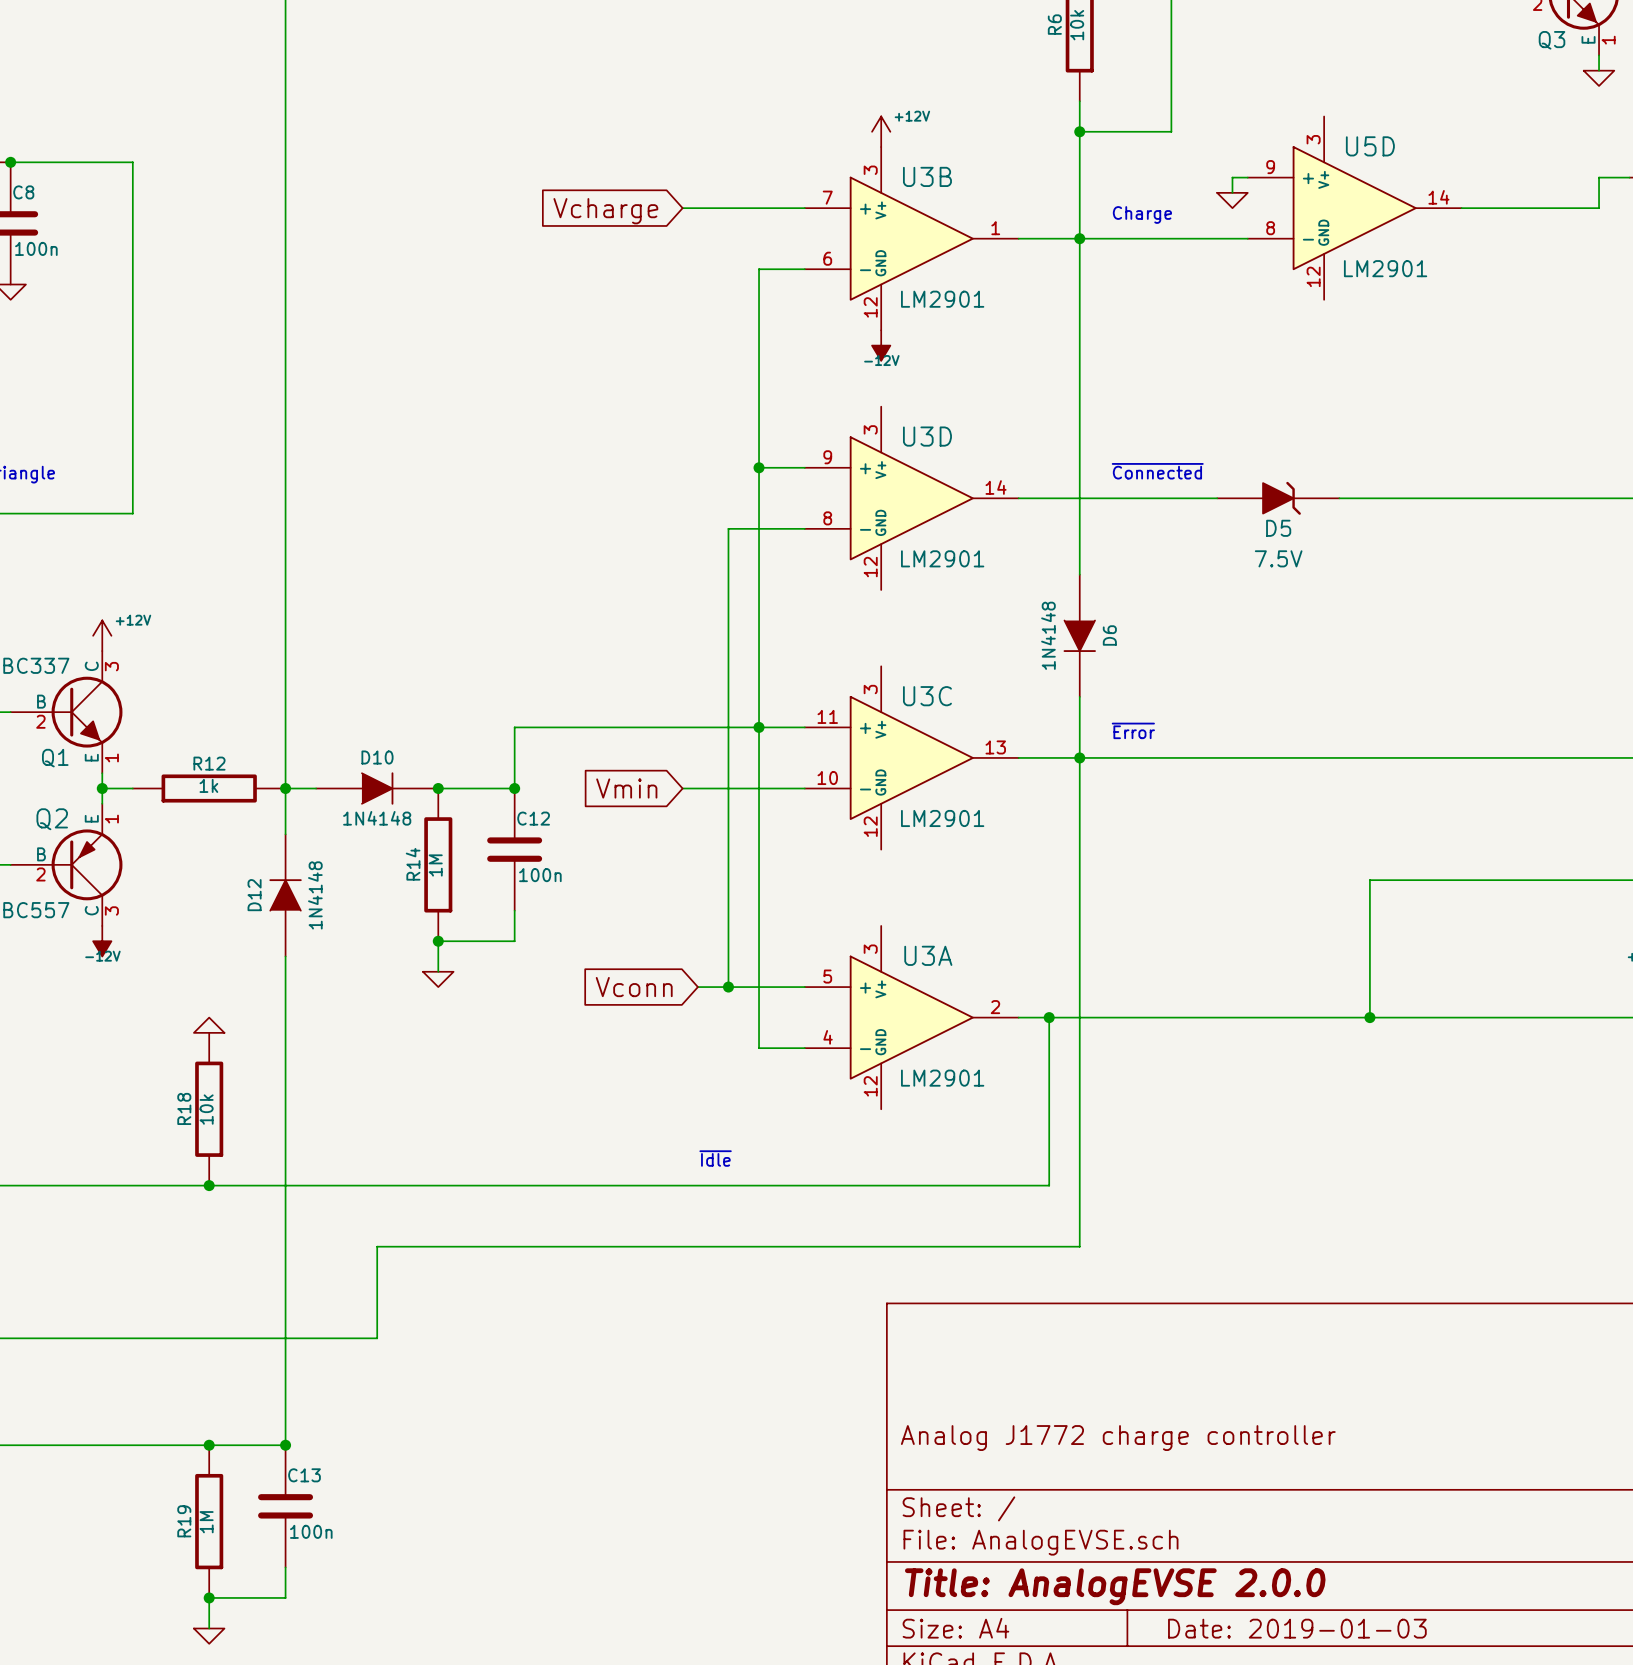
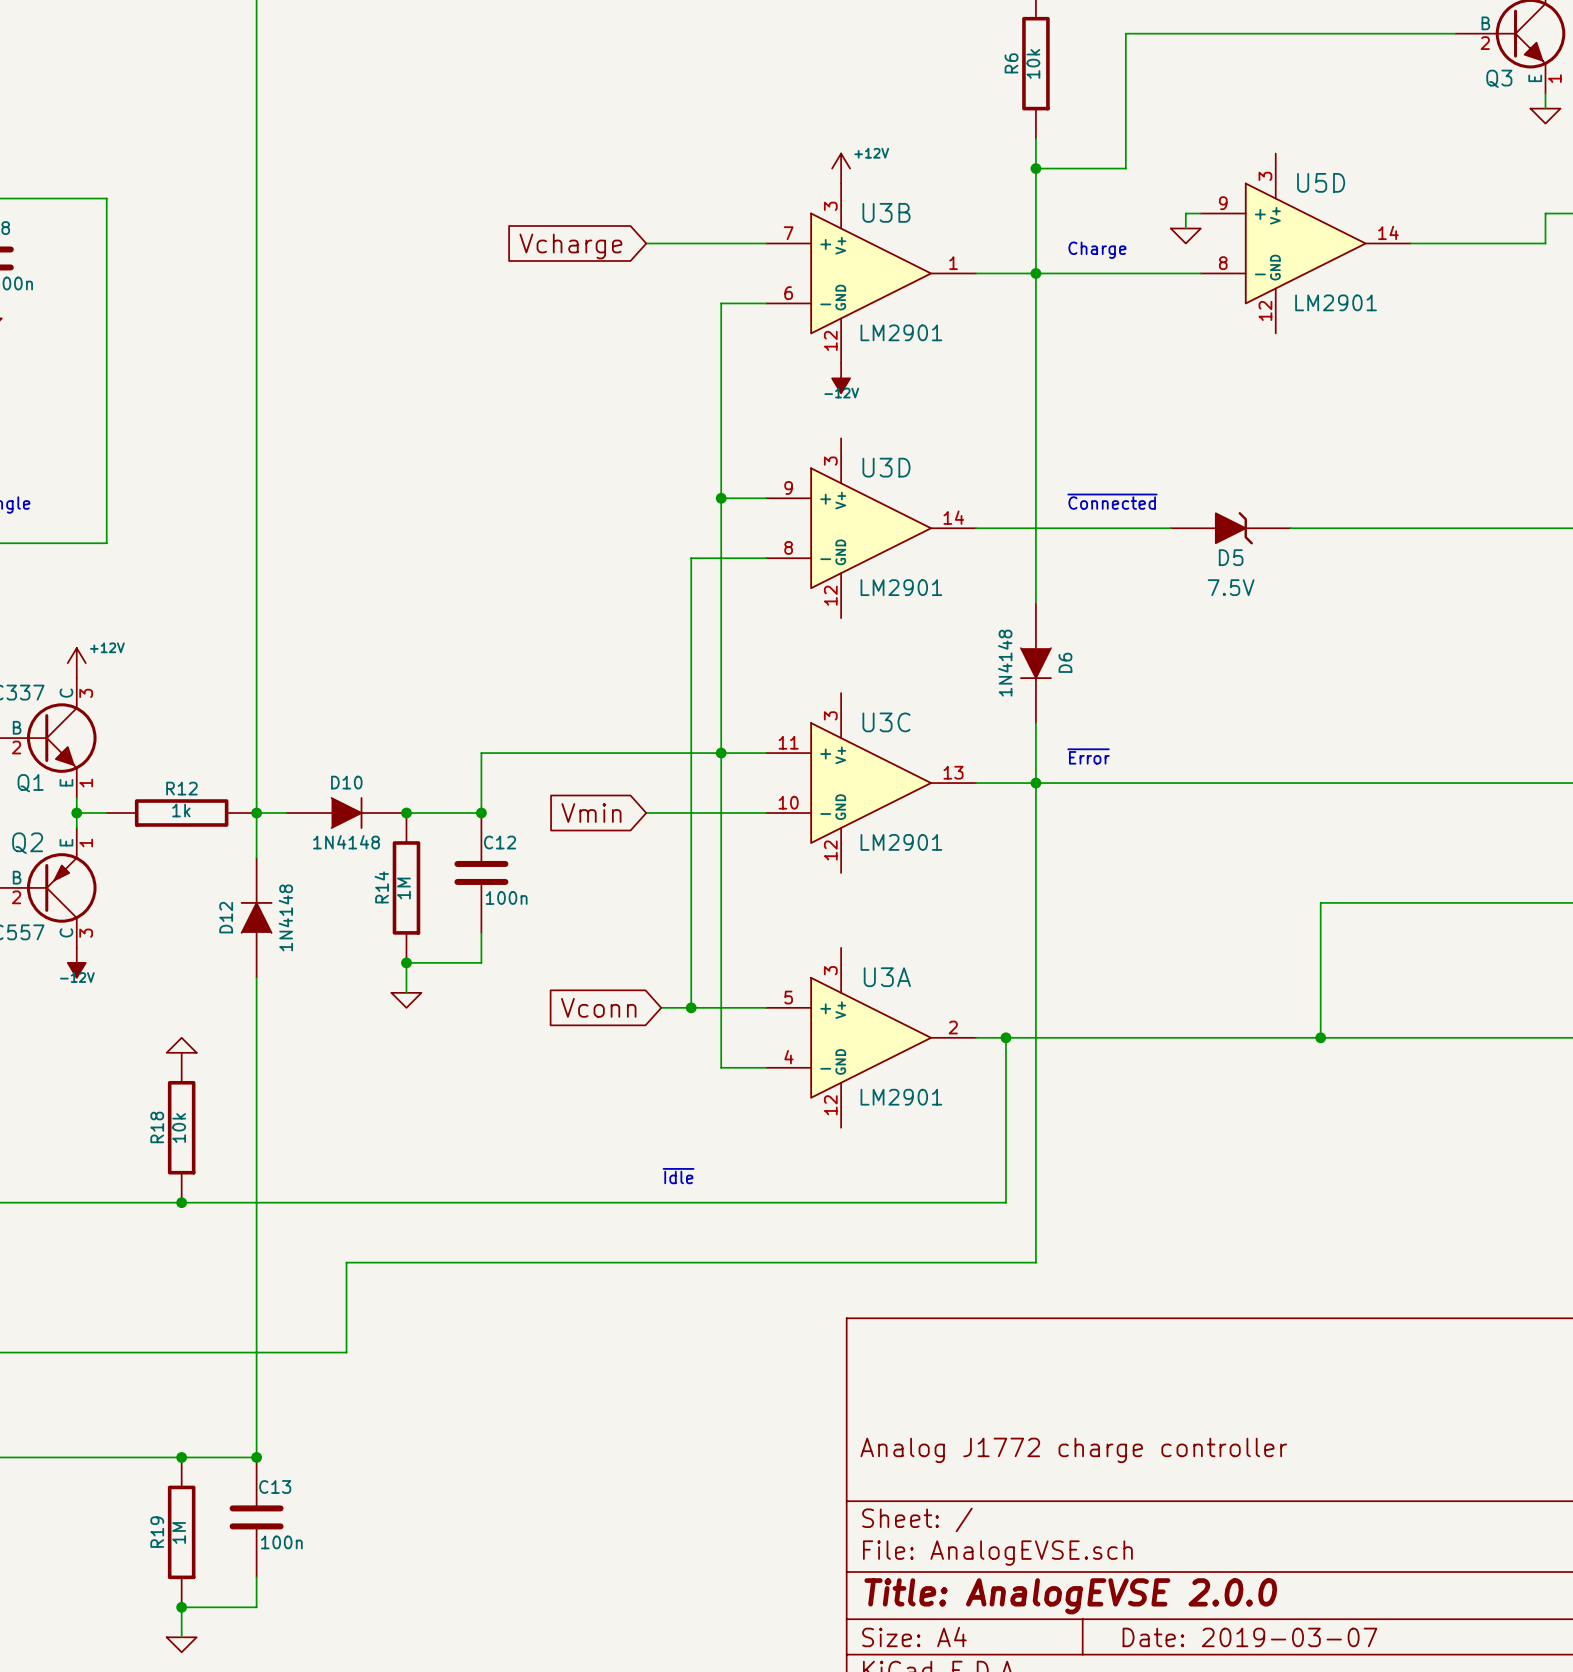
title block: Date: 2019-01-03 (1297, 1628) -> Date: 2019-03-07 (1249, 1637)

